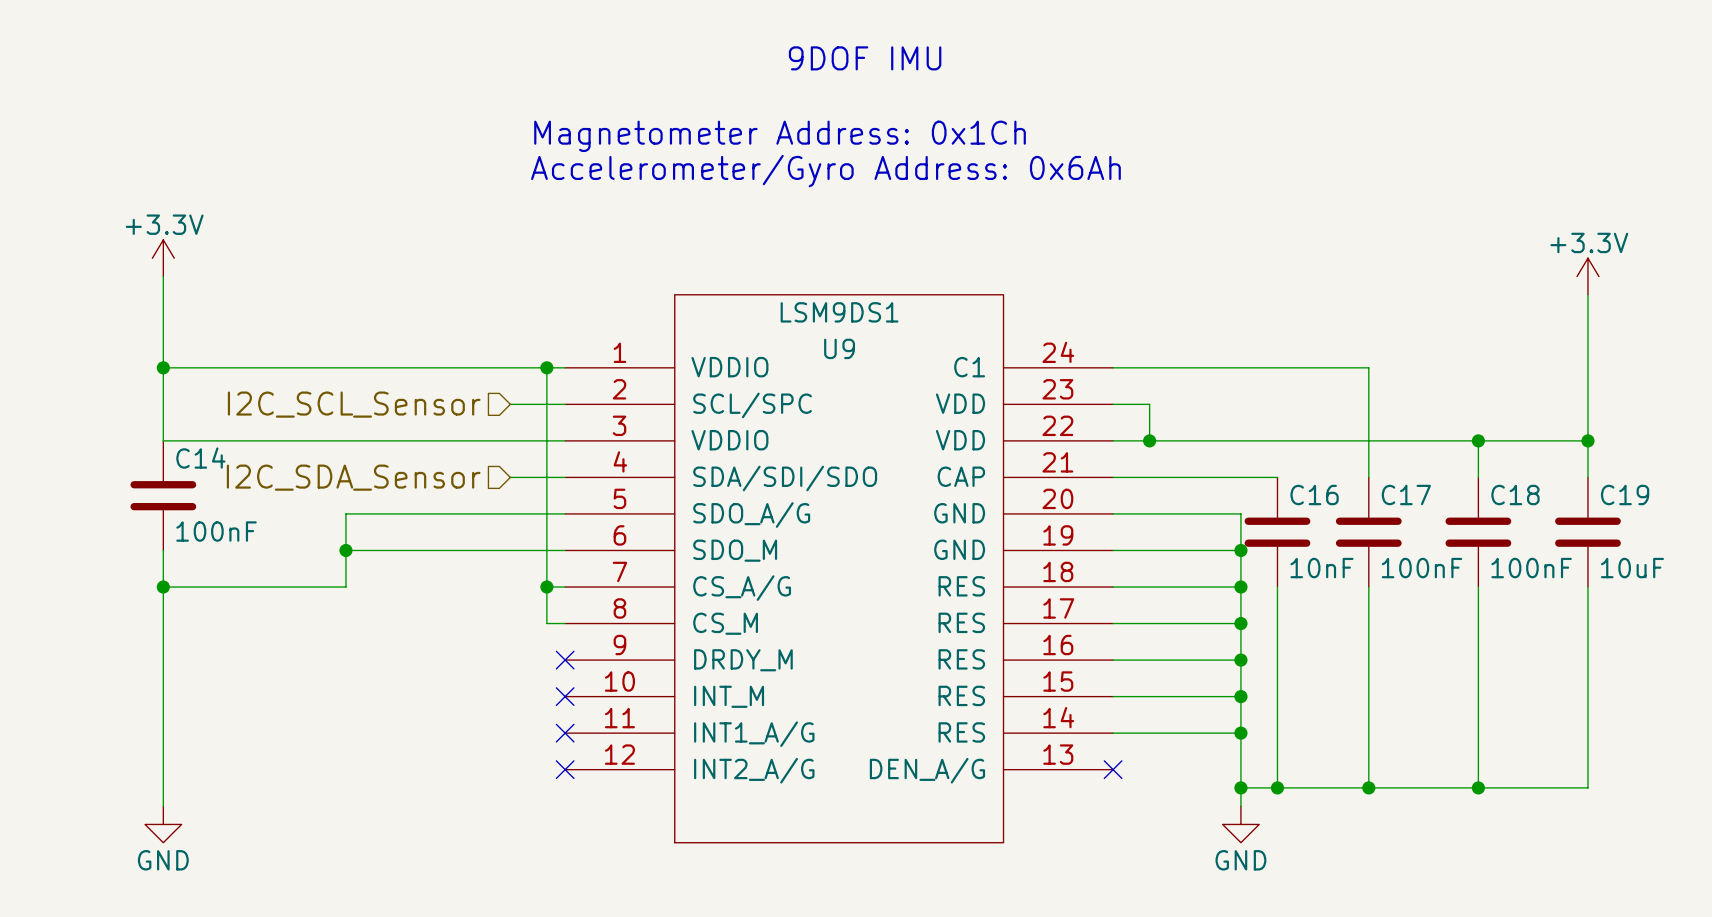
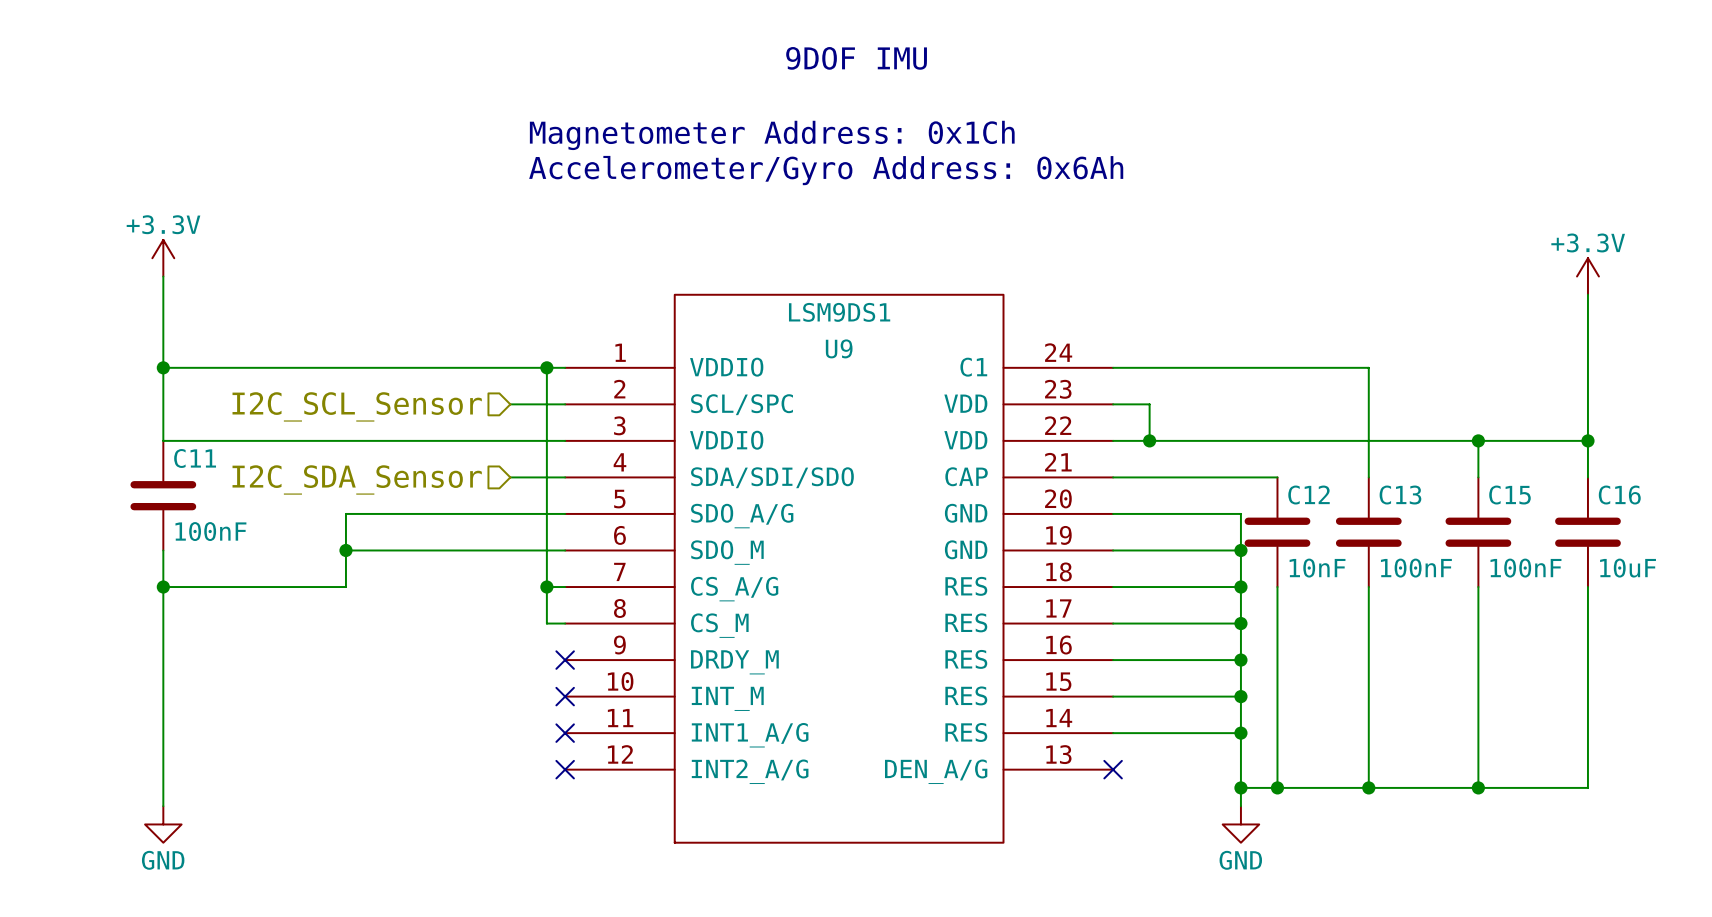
C14 name: C14 (200, 458) -> C11 (195, 458)
C16 name: C16 (1314, 495) -> C12 (1309, 495)
C17 name: C17 (1406, 495) -> C13 (1400, 495)
C18 name: C18 (1515, 495) -> C15 (1509, 495)
C19 name: C19 (1625, 495) -> C16 (1619, 495)

